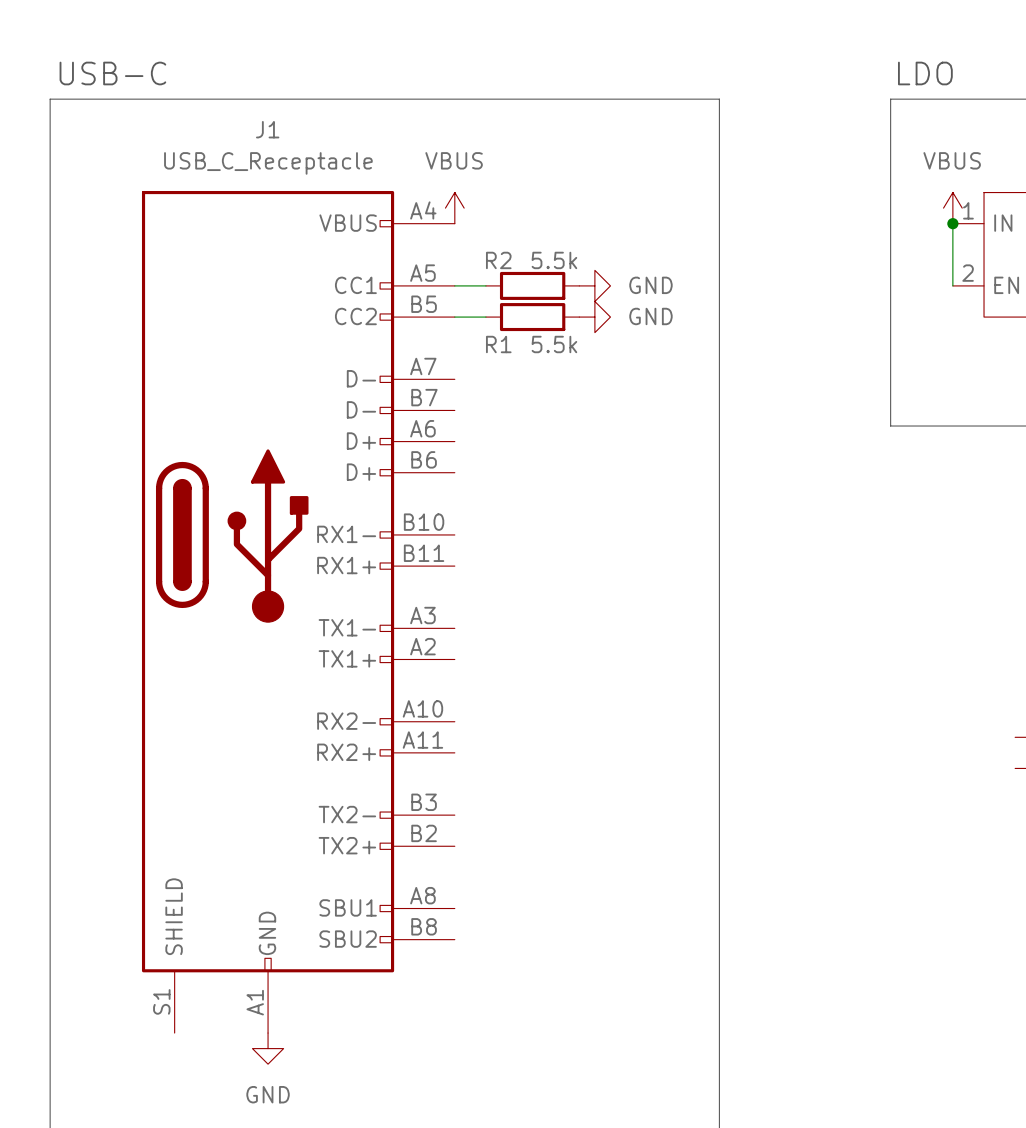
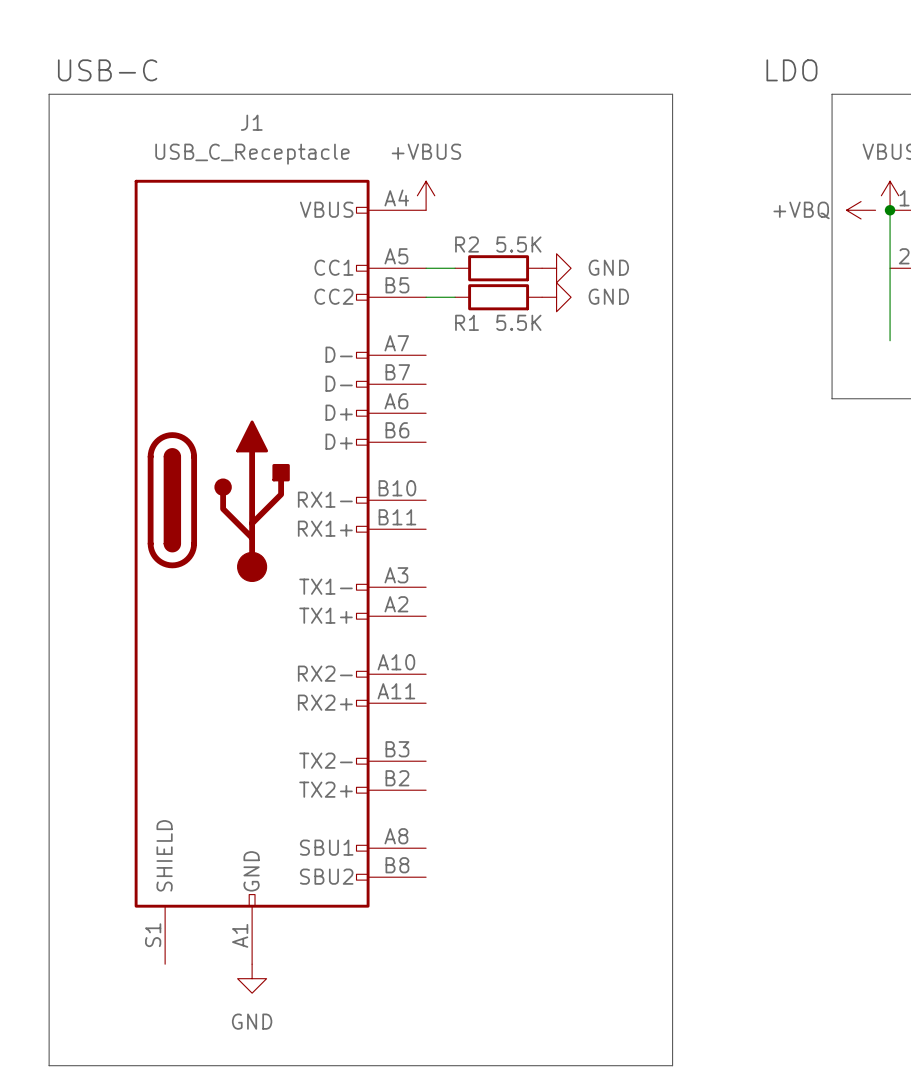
text position: LDO (925, 73) -> LDO (791, 70)
power symbol: VBUS (454, 208) -> +VBUS (426, 195)
power symbol: none -> +VBQ (861, 210)
R2 value: 5.5k (554, 260) -> 5.5K (518, 244)
wire: none -> (890, 268) (890, 340)
R1 value: 5.5k (554, 344) -> 5.5K (518, 322)

